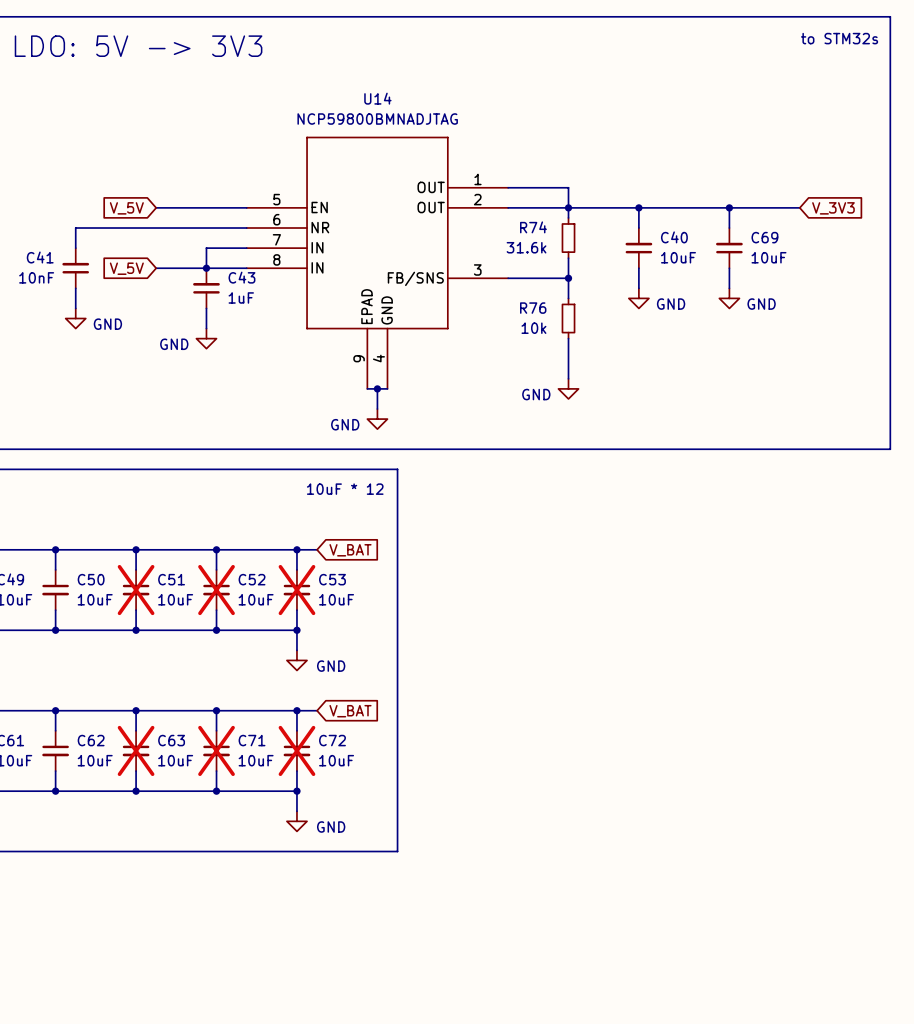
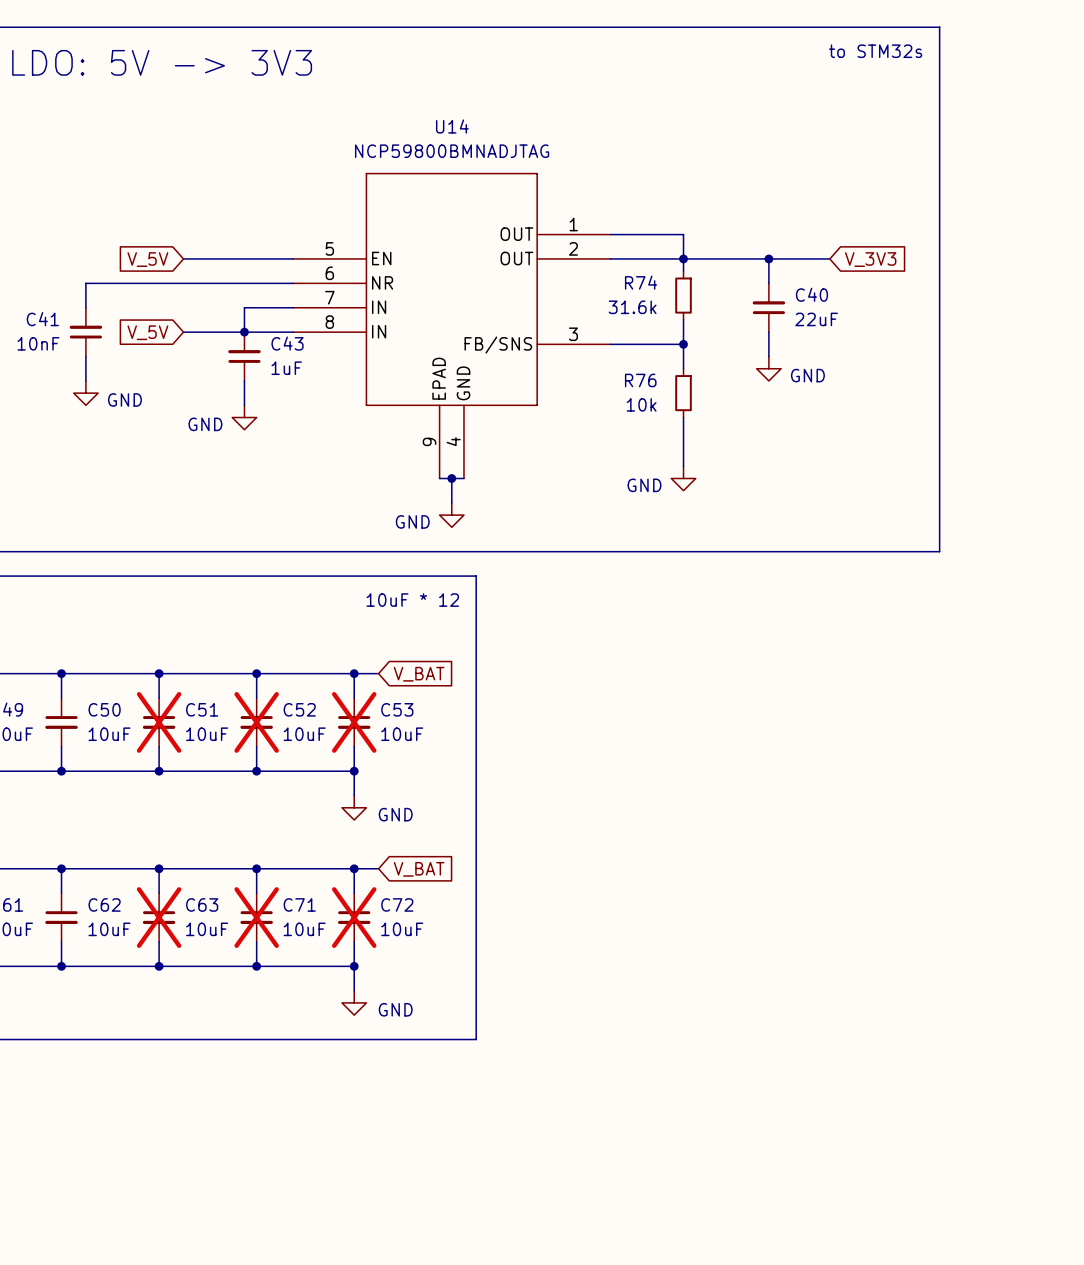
line: (779, 16) (890, 16) (890, 449) (779, 449) -> (939, 27) (939, 551)
text position: to STM32s (839, 38) -> to STM32s (875, 51)
wire: (689, 207) (799, 207) -> none
wire: (729, 207) (729, 228) -> none
junction: (729, 207) -> none
global label position: V_3V3 (833, 208) -> V_3V3 (870, 259)
C69: 10uF (729, 248) -> none
C40 value: 10uF (678, 257) -> 22uF (816, 319)
wire: (729, 268) (729, 288) -> none
power symbol: GND (729, 298) -> none

